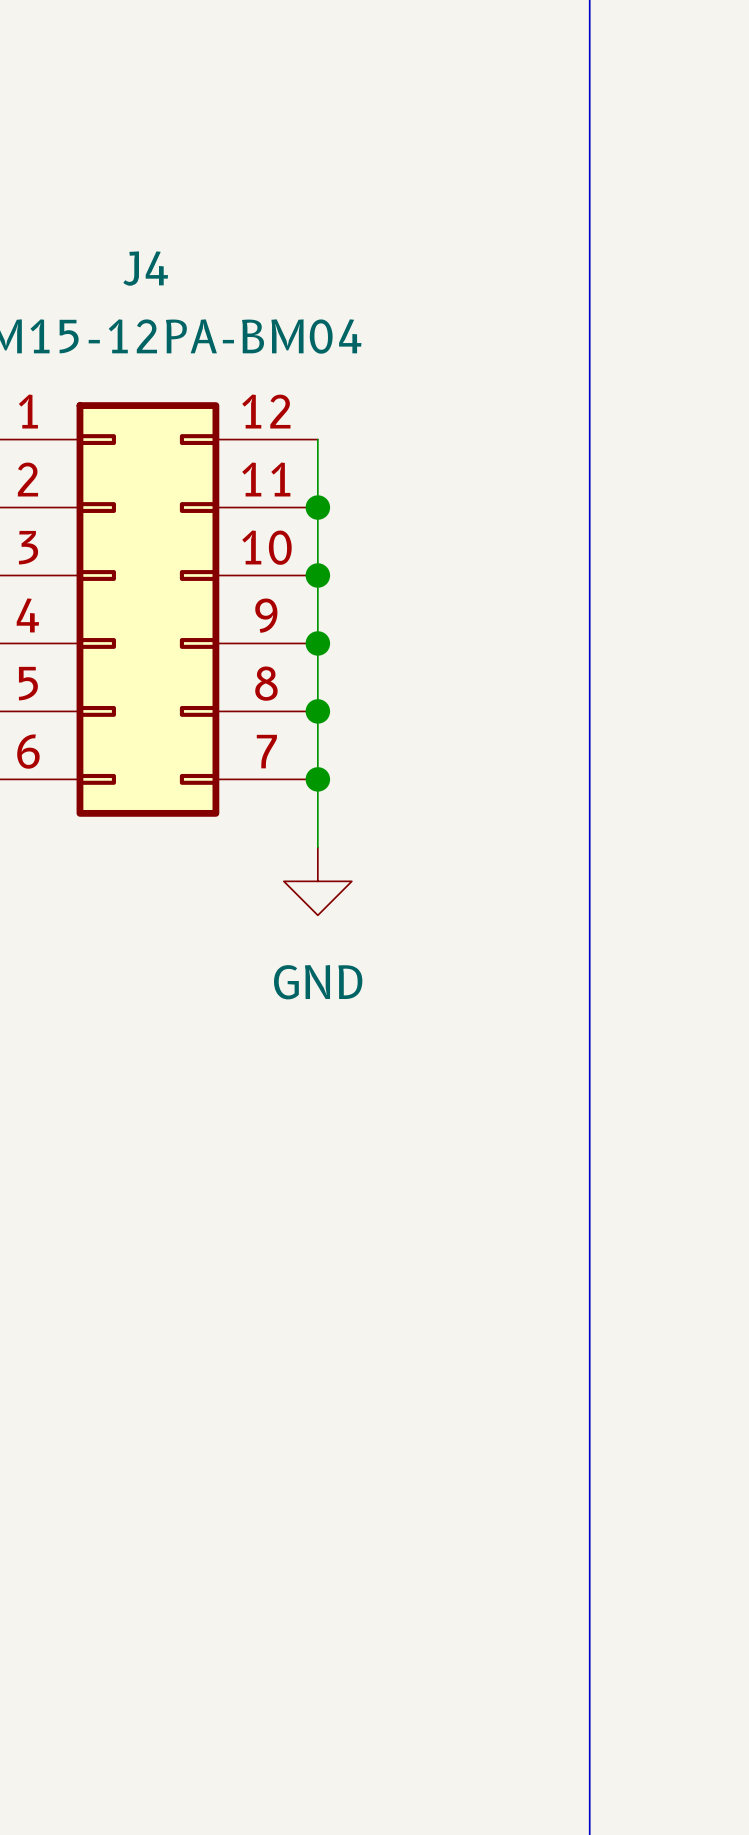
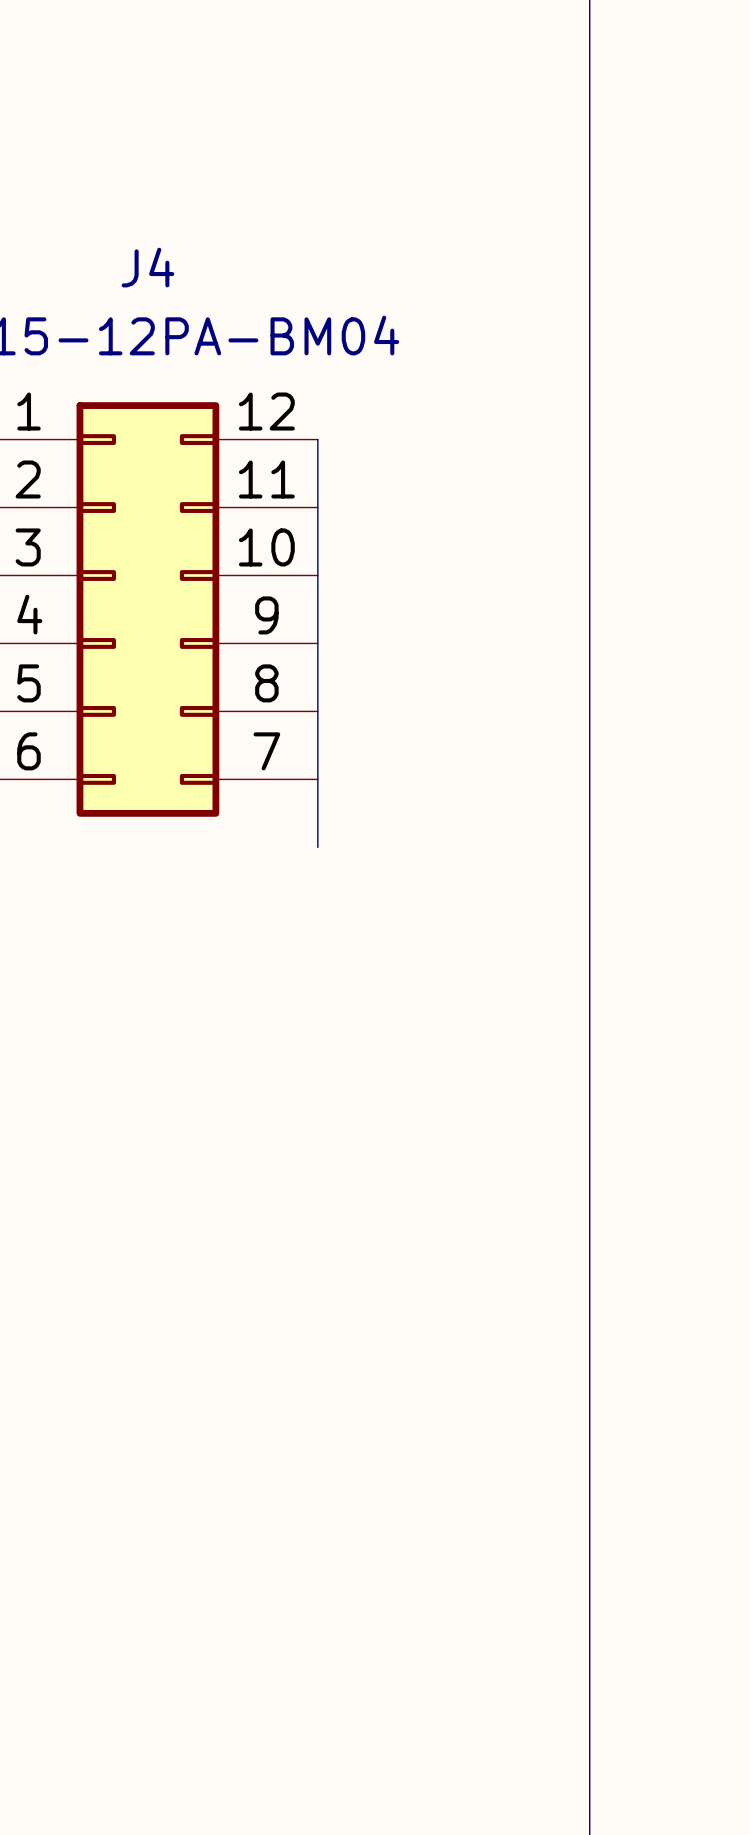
junction: (317, 507) -> none
junction: (317, 575) -> none
junction: (317, 643) -> none
junction: (317, 711) -> none
junction: (317, 779) -> none
power symbol: GND (317, 881) -> none

